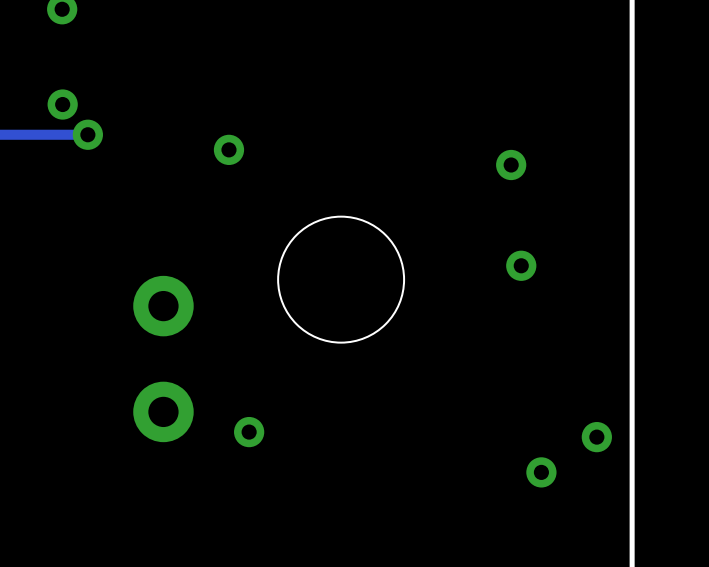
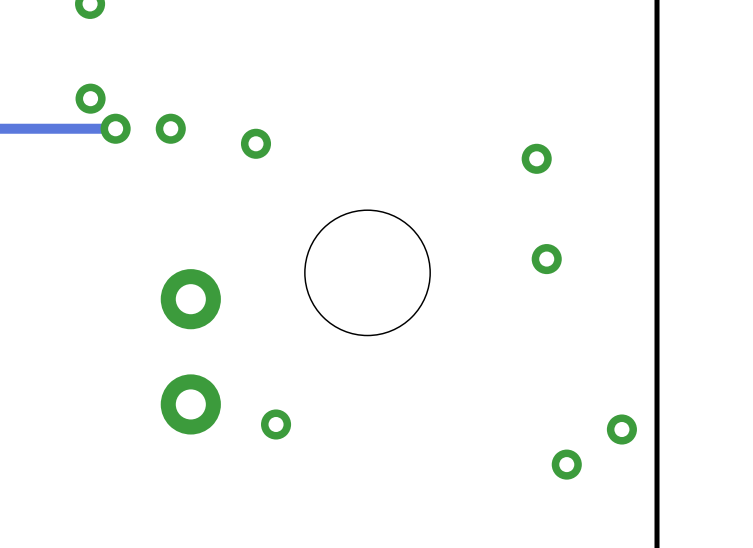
via: none -> (170, 128)

